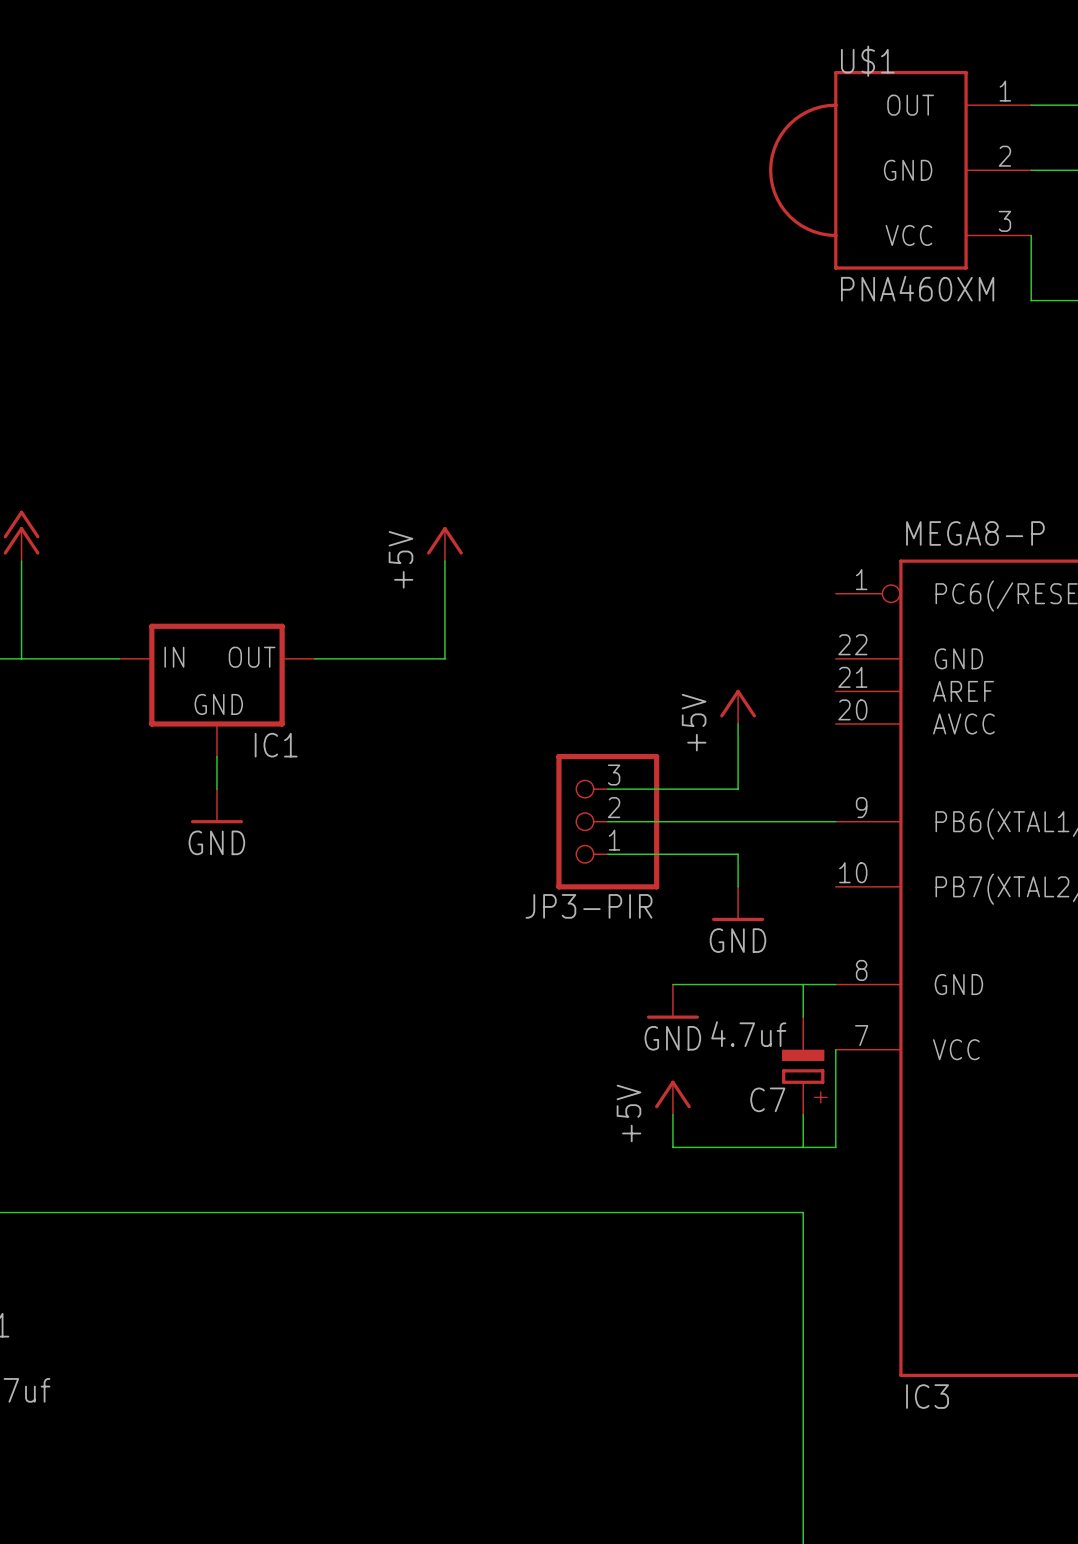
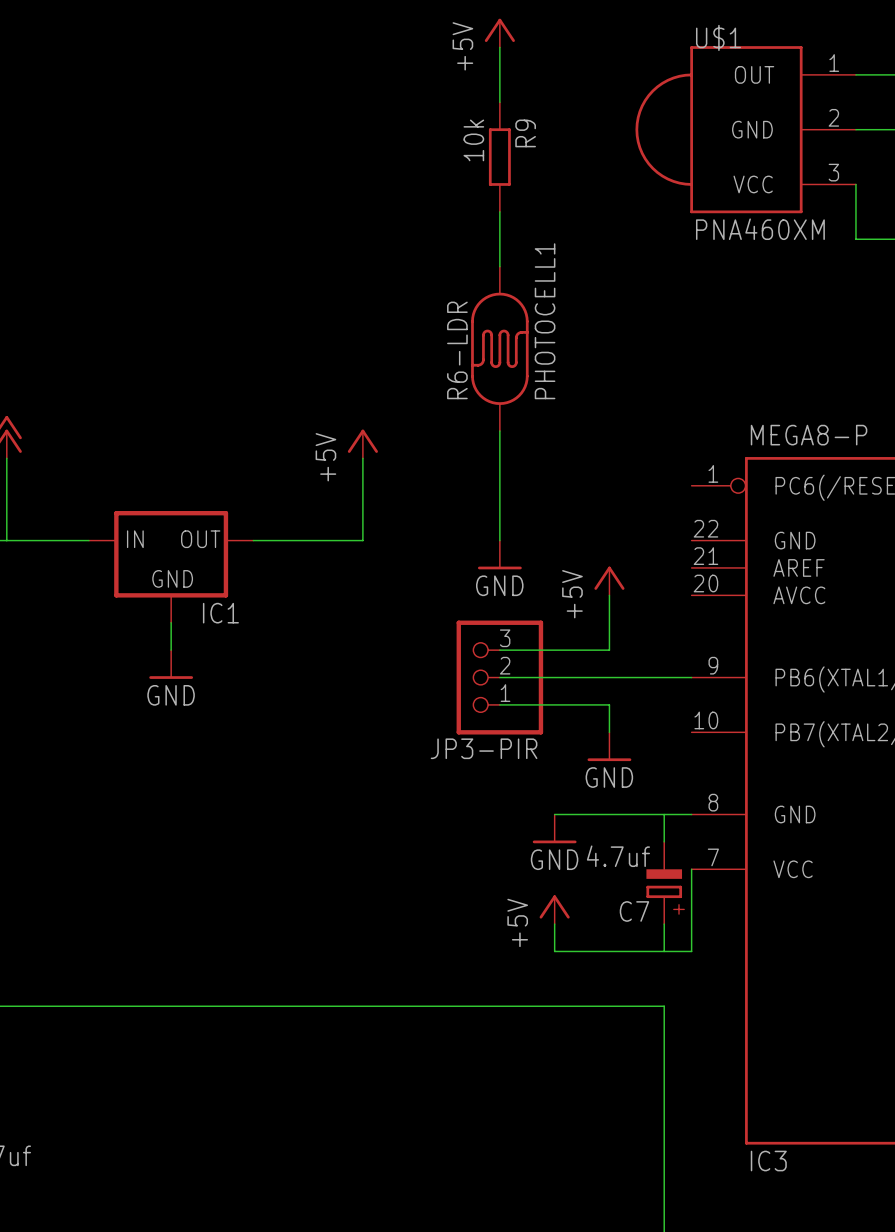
power symbol: none -> +5V (499, 33)
wire: none -> (499, 47) (499, 102)
R9: none -> 10k (499, 157)
wire: none -> (499, 211) (499, 266)
R6-LDR: none -> PHOTOCELL1 (499, 348)
wire: none -> (499, 431) (499, 540)
power symbol: none -> GND (499, 554)

